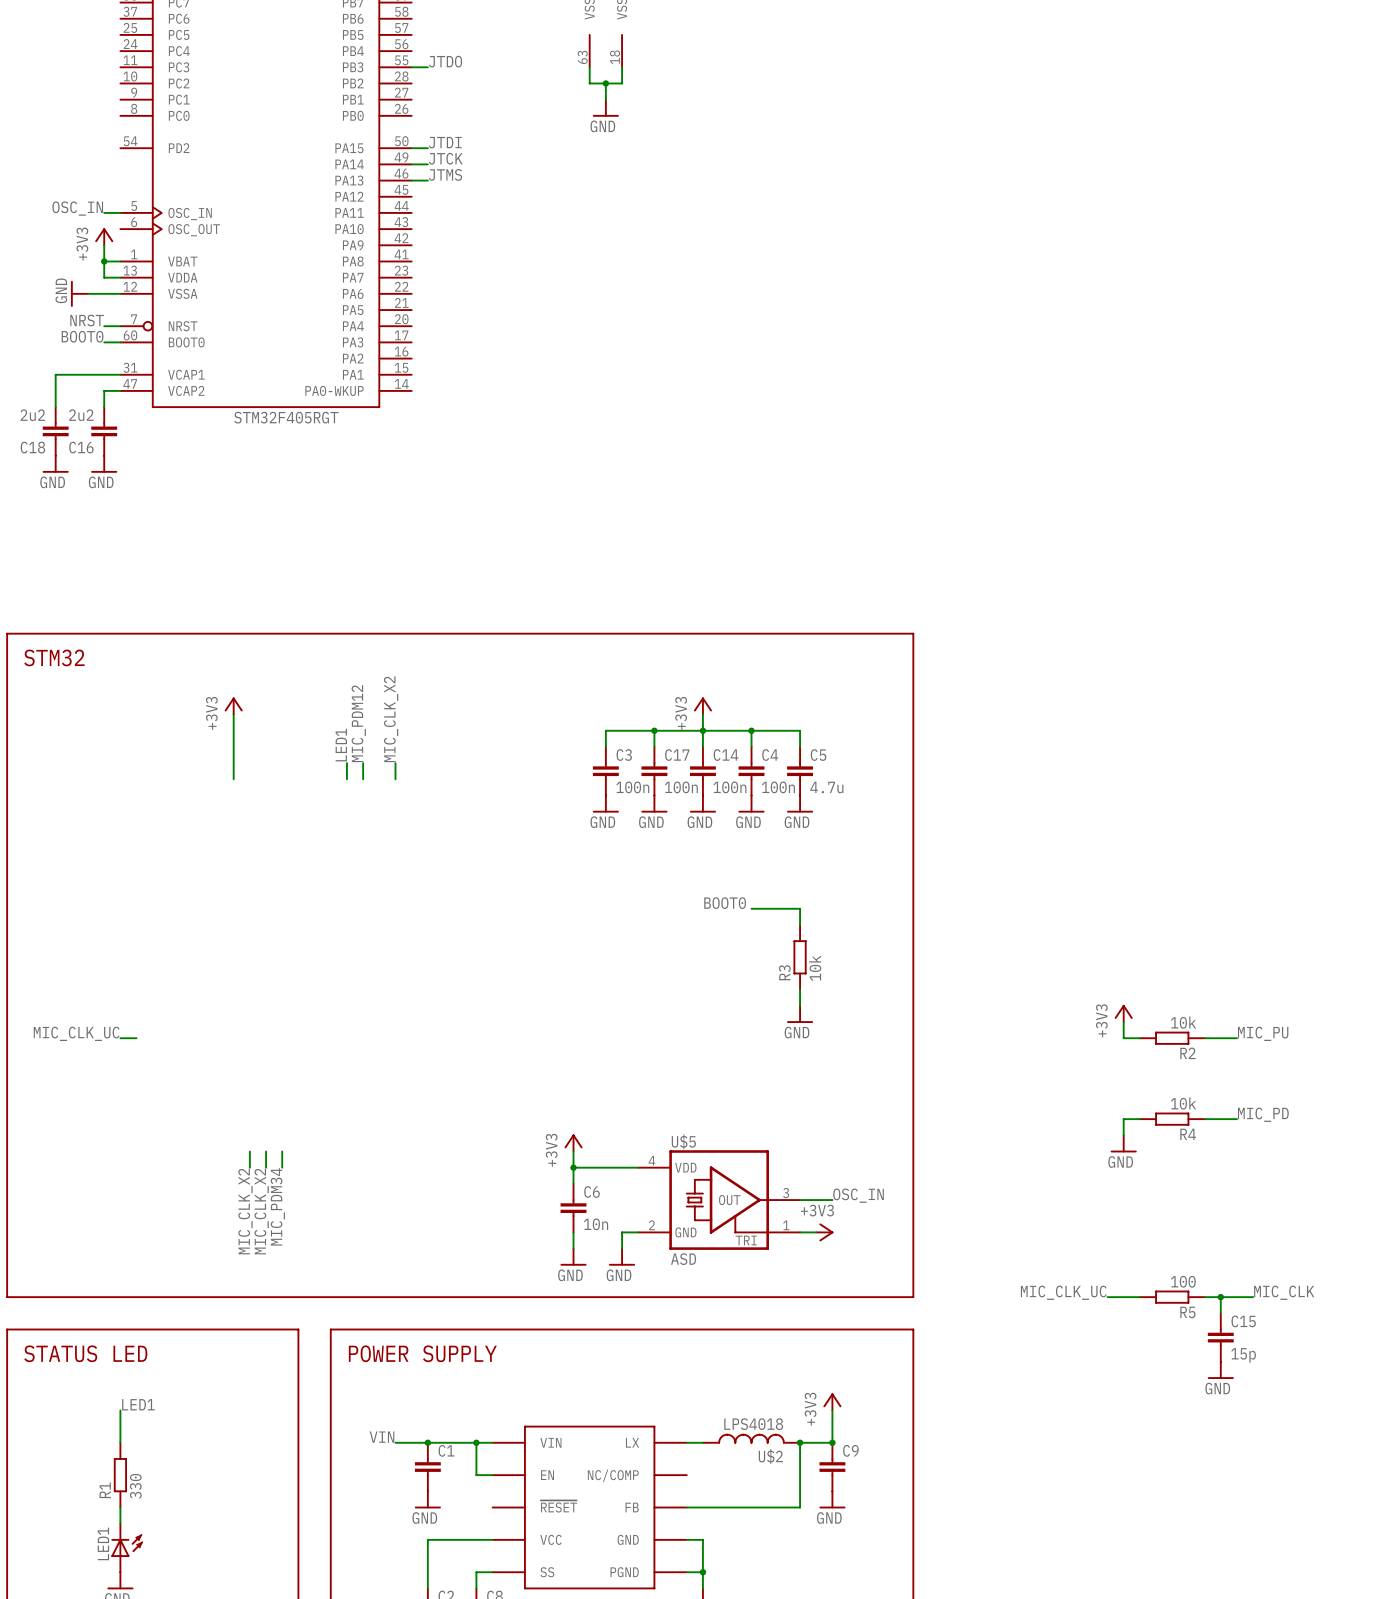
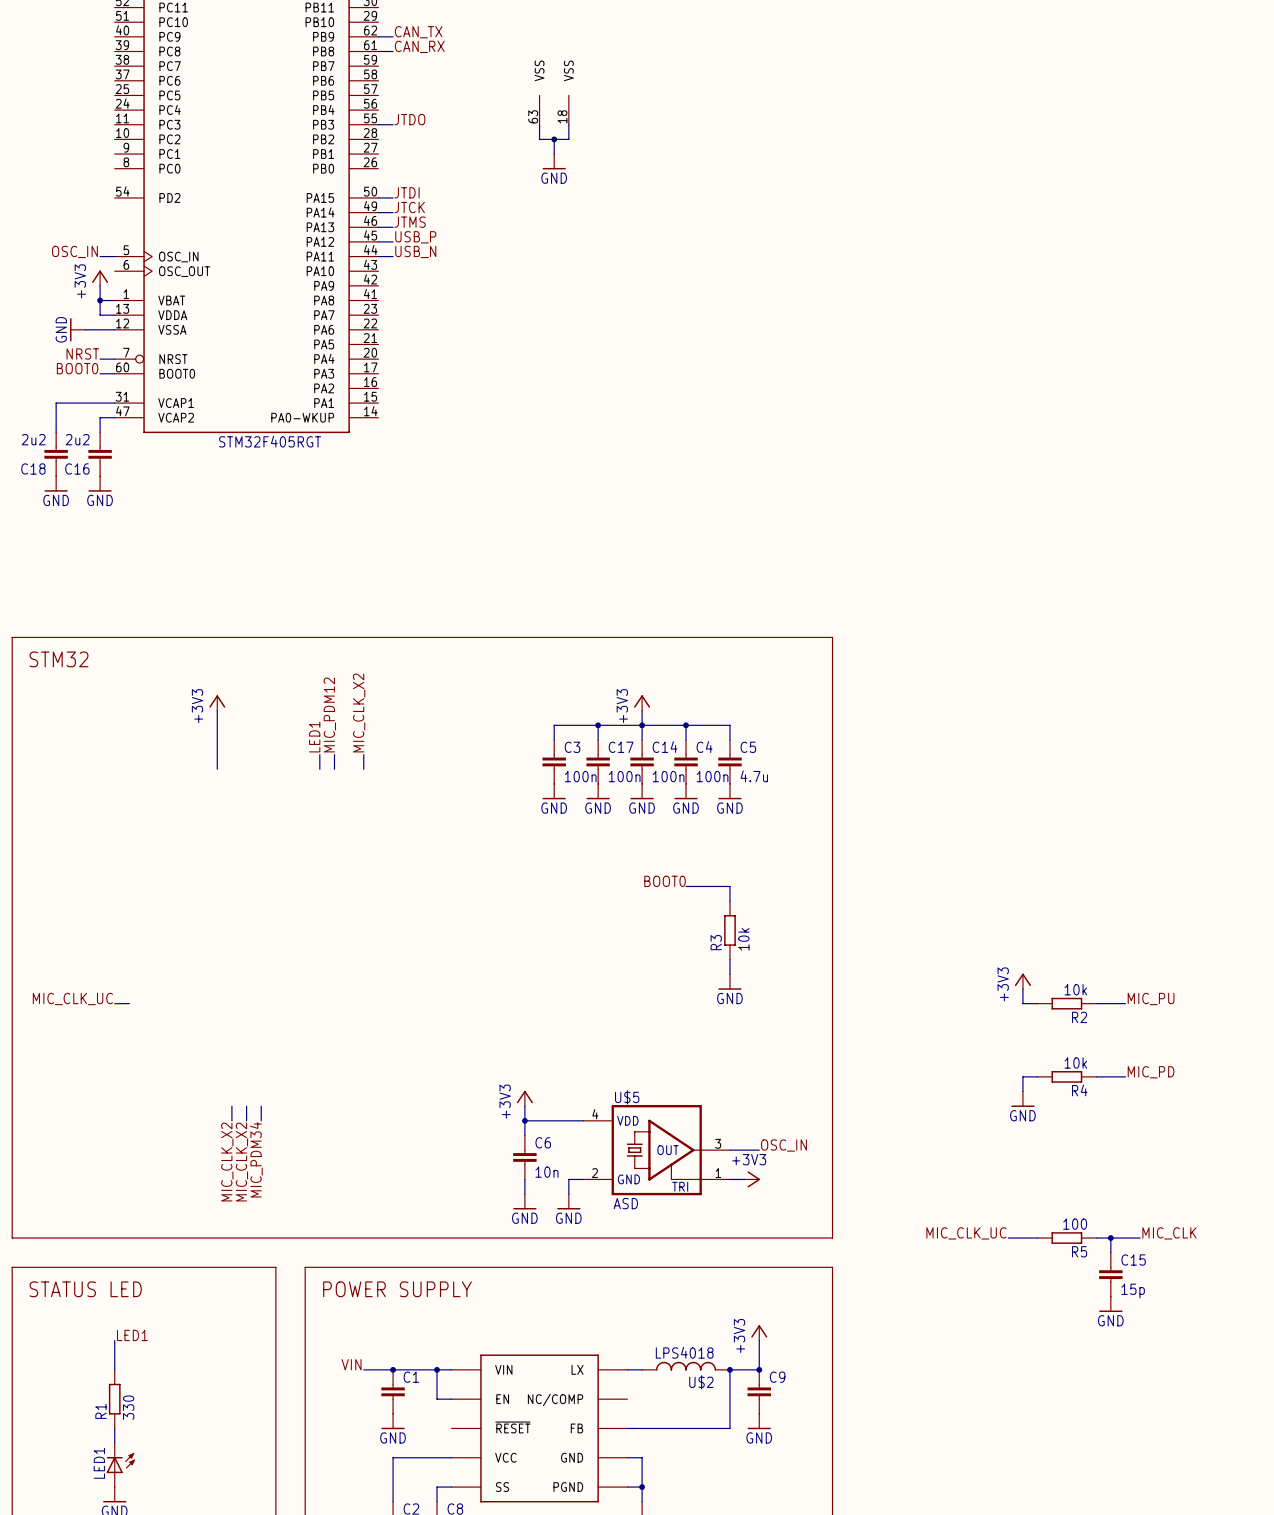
label: none -> USB_P (415, 237)
wire: none -> (378, 241) (393, 241)
label: none -> USB_N (415, 251)
wire: none -> (378, 256) (393, 256)

